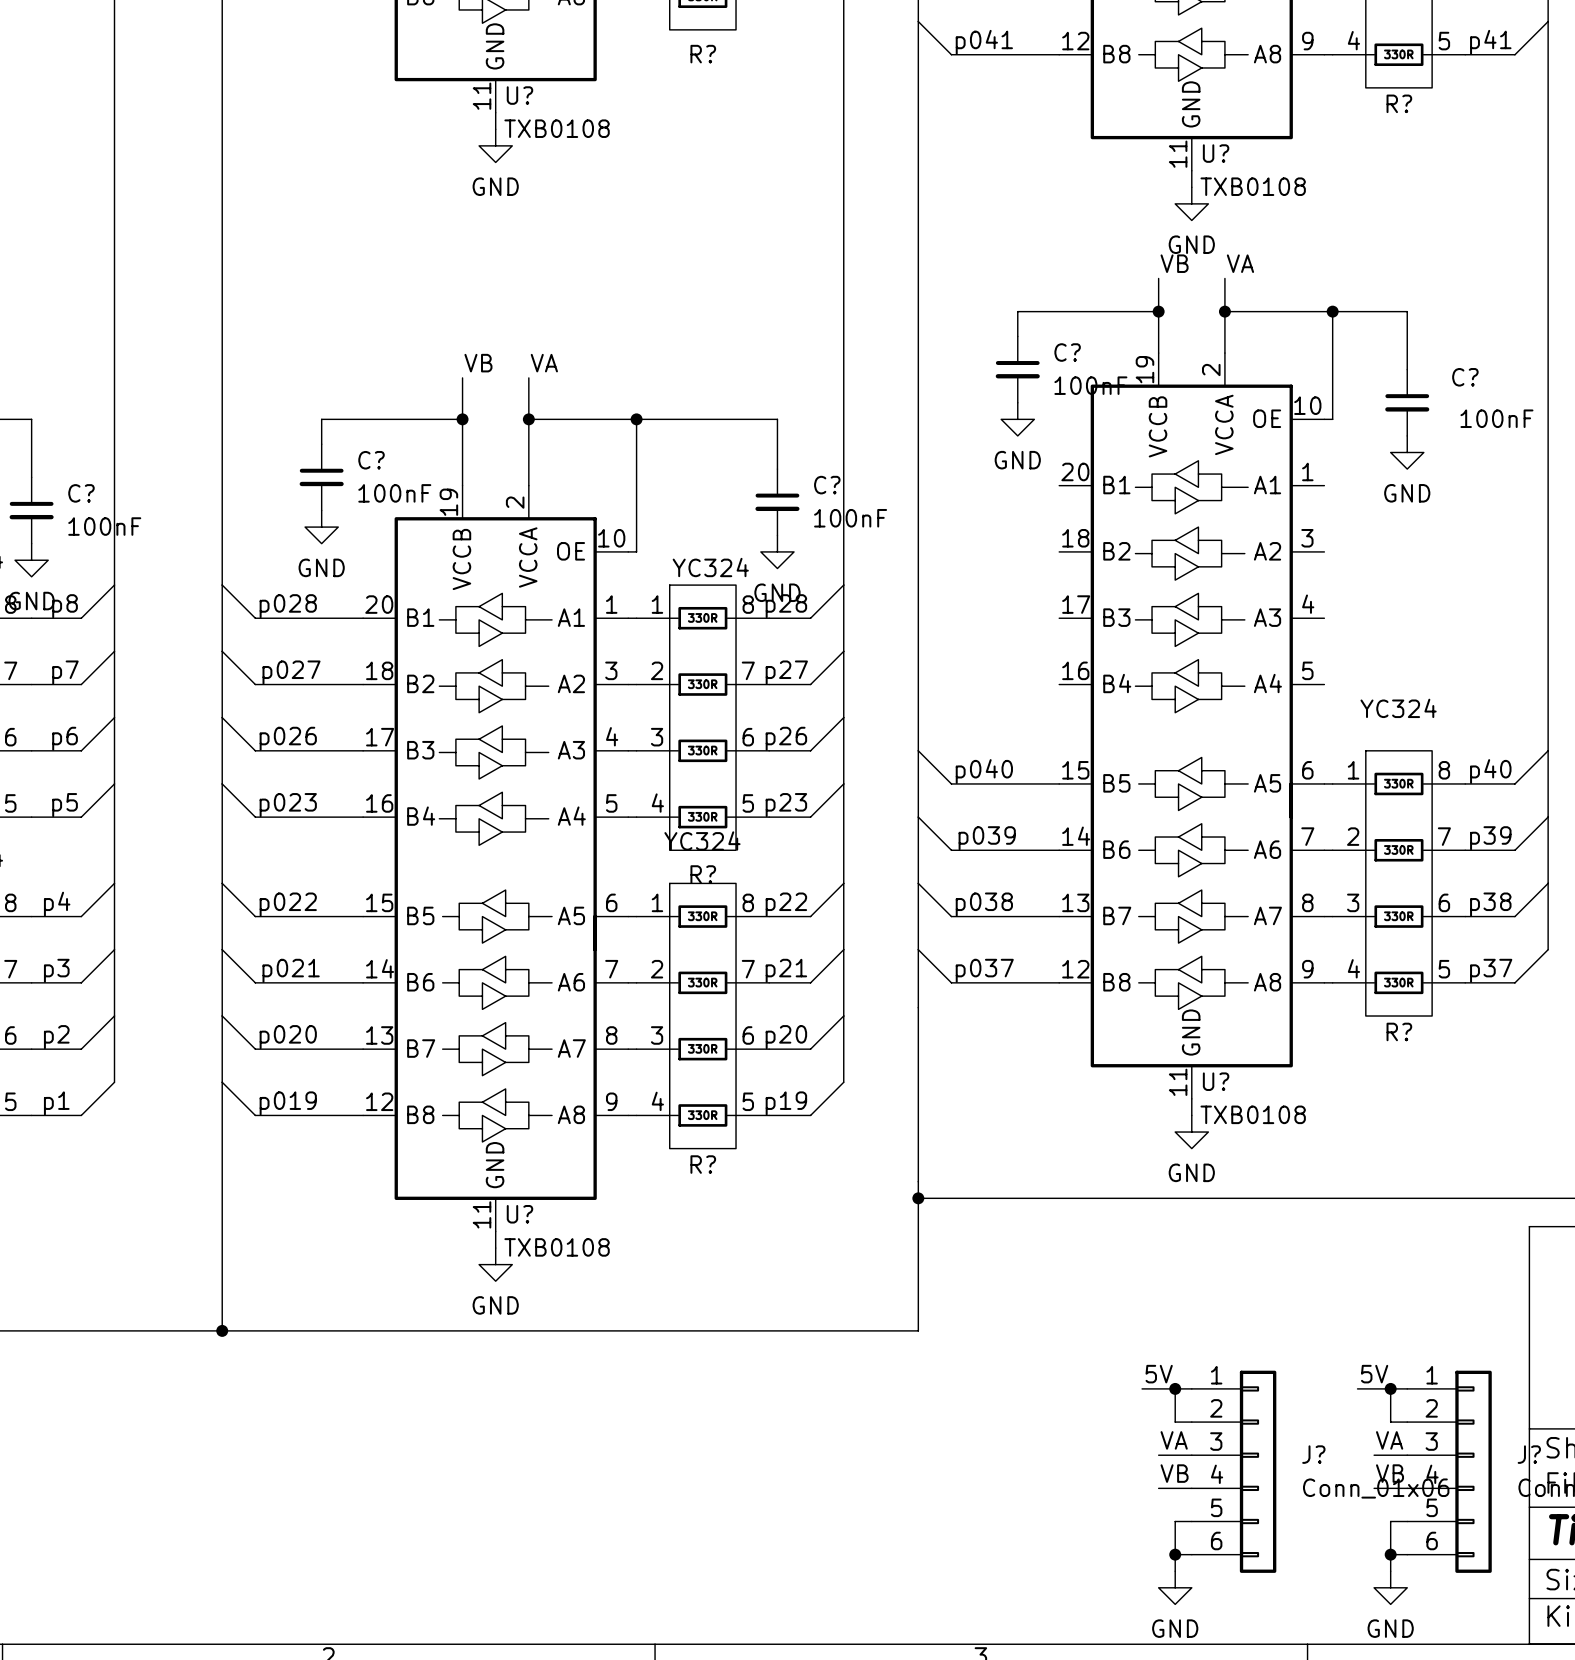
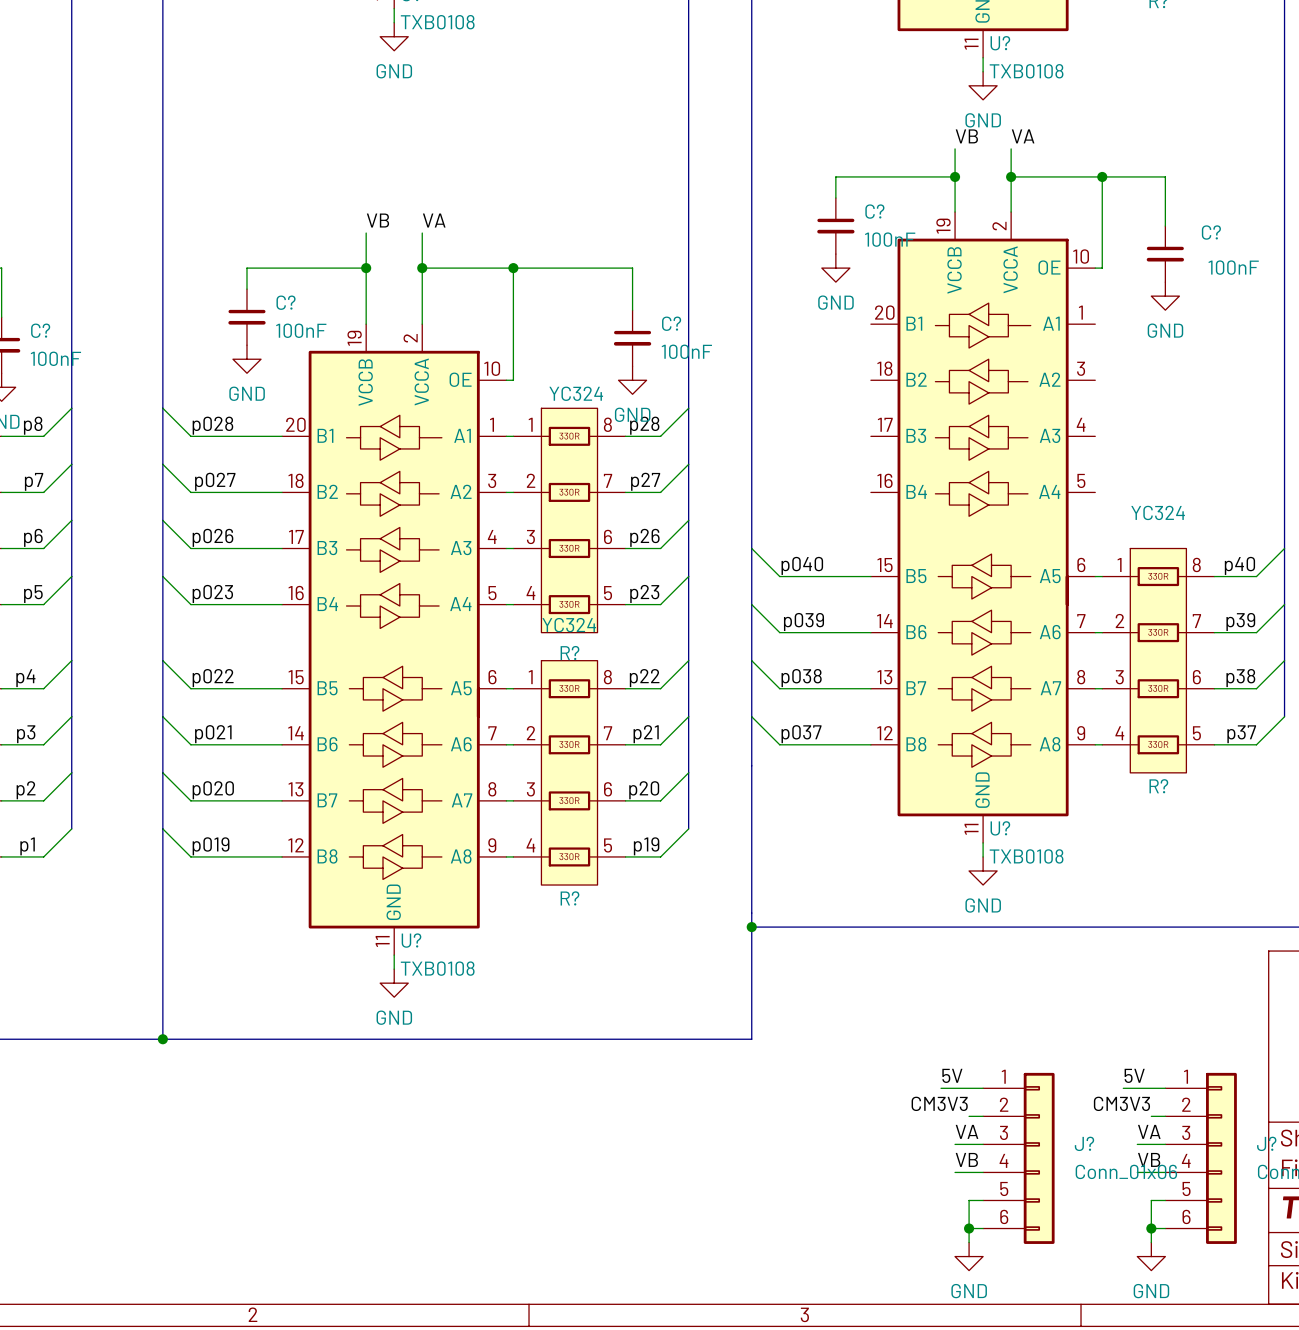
wire: (1175, 1388) (1175, 1422) -> none
junction: (1175, 1388) -> none
wire: (1390, 1388) (1390, 1422) -> none
junction: (1390, 1388) -> none
label: none -> CM3V3 (939, 1103)
label: none -> CM3V3 (1121, 1103)

